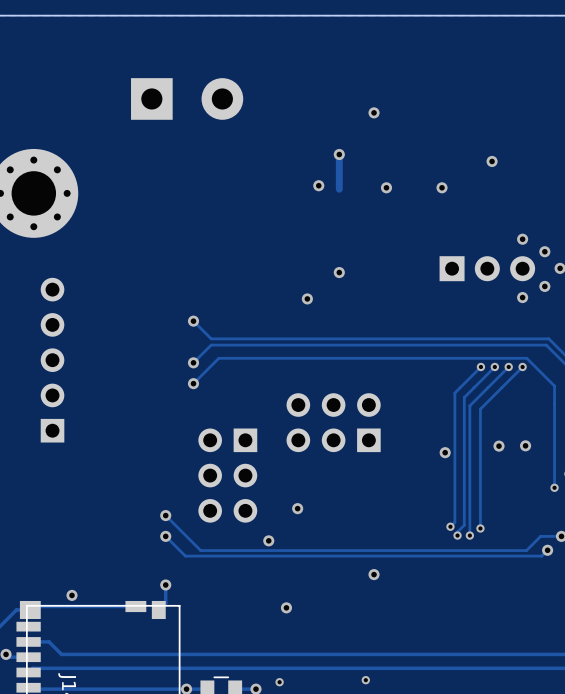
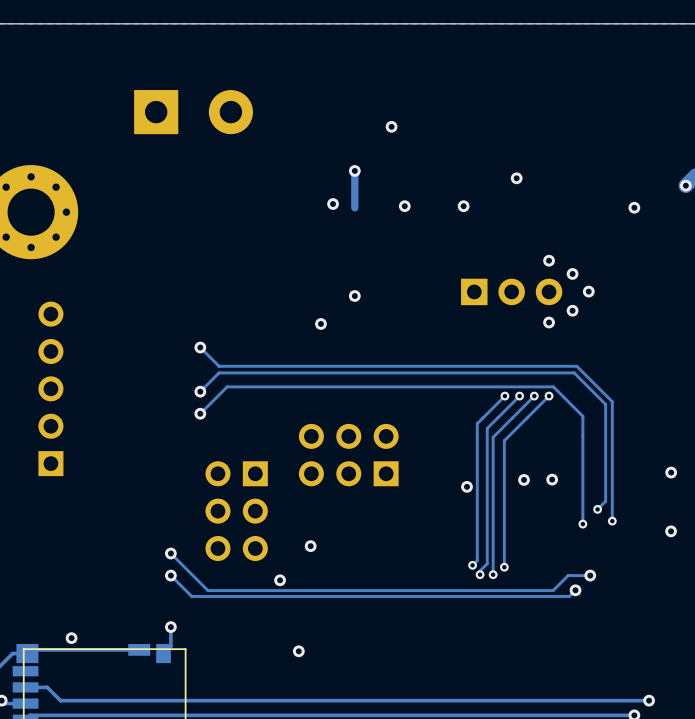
via: (374, 574) -> none

